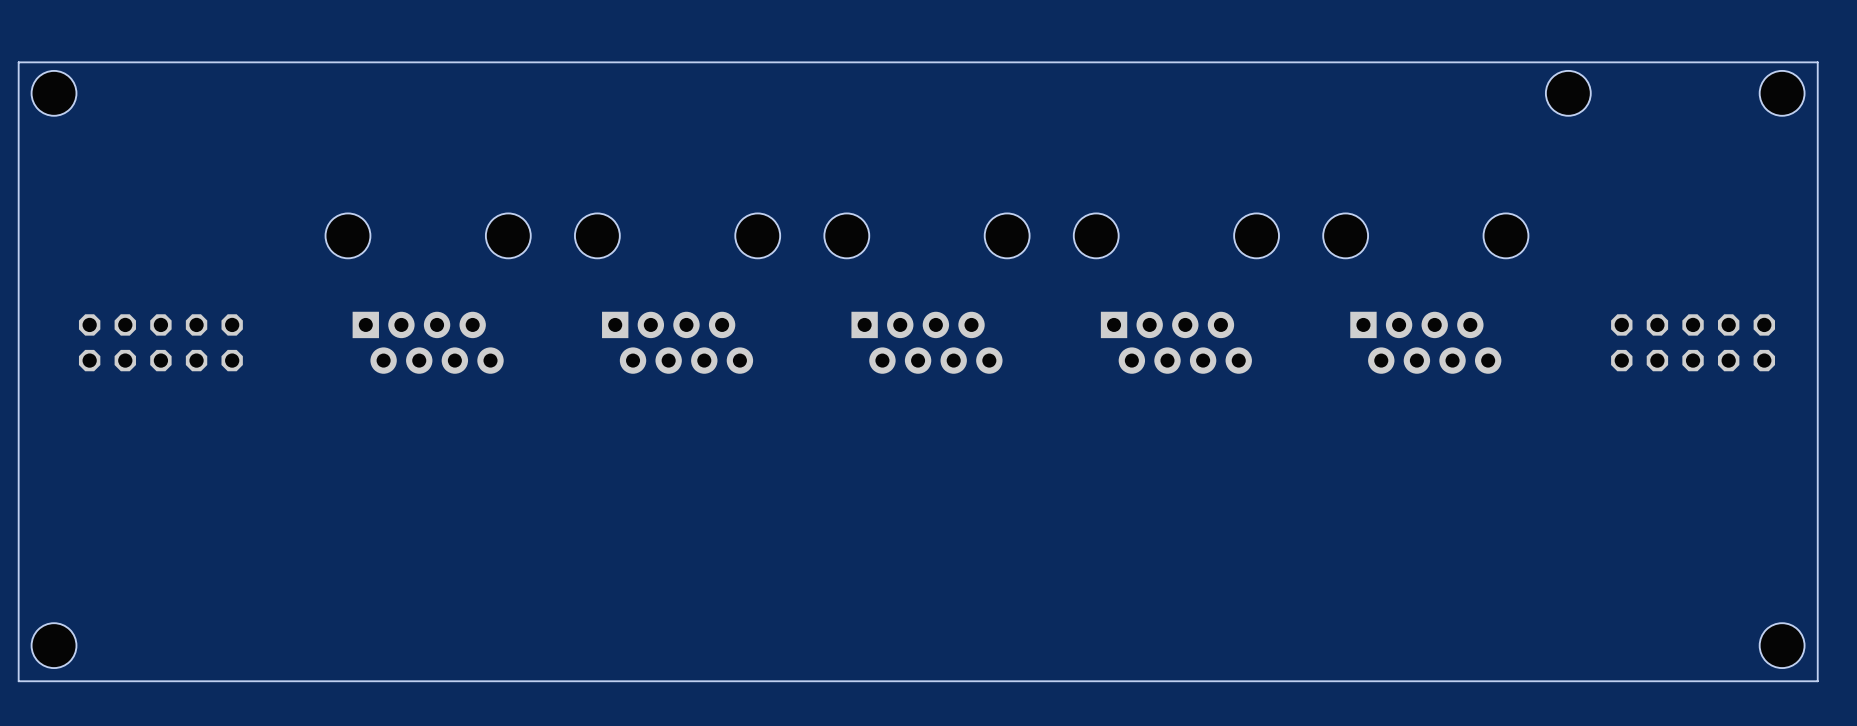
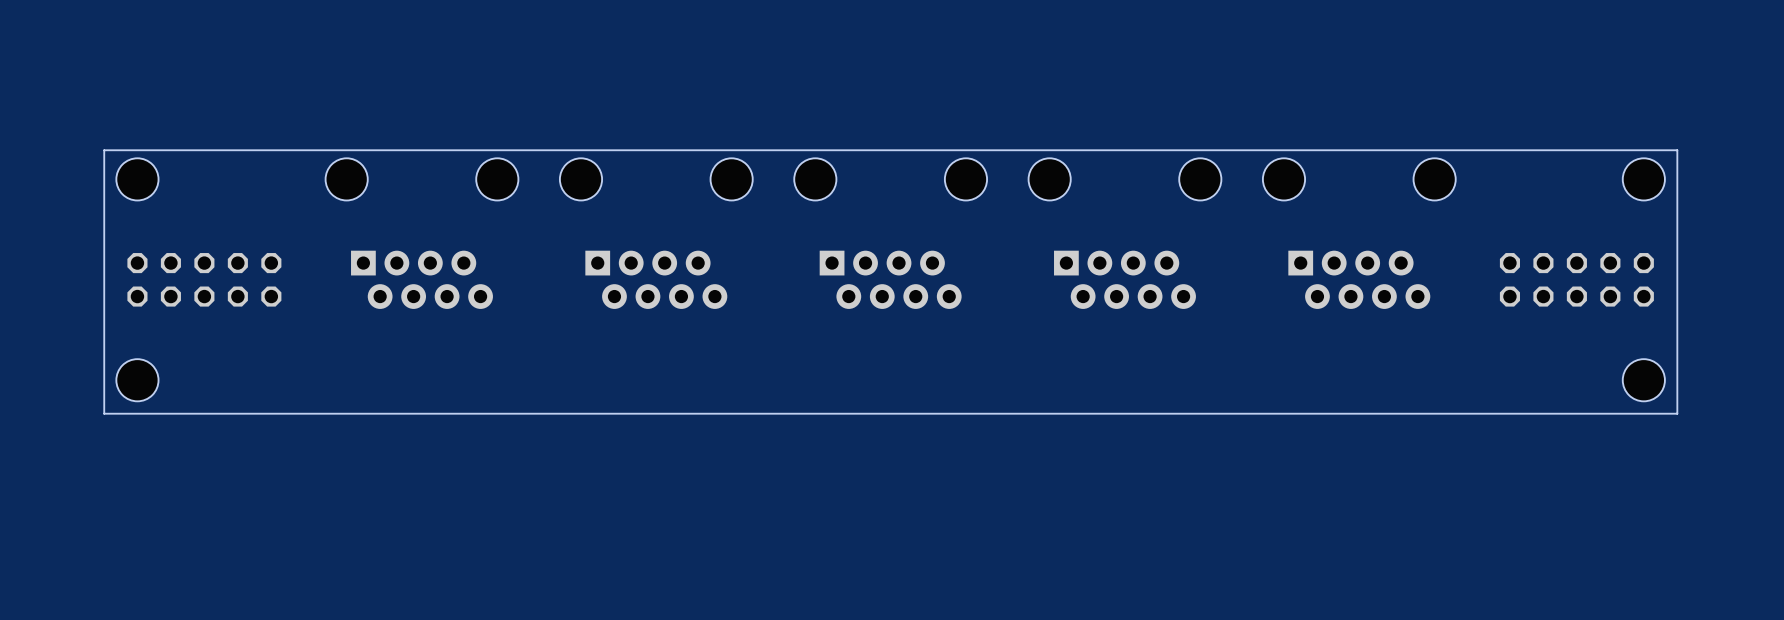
board edge: (1817, 62) (18, 62) (18, 681) (1817, 681) (1817, 62) -> none
hole position: (54, 93) -> (137, 179)
hole: (1568, 93) -> none
hole: (1782, 93) -> none
board edge: none -> (1677, 150) (104, 150) (104, 413) (1677, 413) (1677, 150)
hole: none -> (1643, 179)
part position: (160, 342) -> (204, 279)
part position: (1693, 342) -> (1576, 279)
hole: none -> (137, 380)
hole: none -> (1643, 380)
hole: (54, 645) -> none
hole: (1782, 645) -> none

